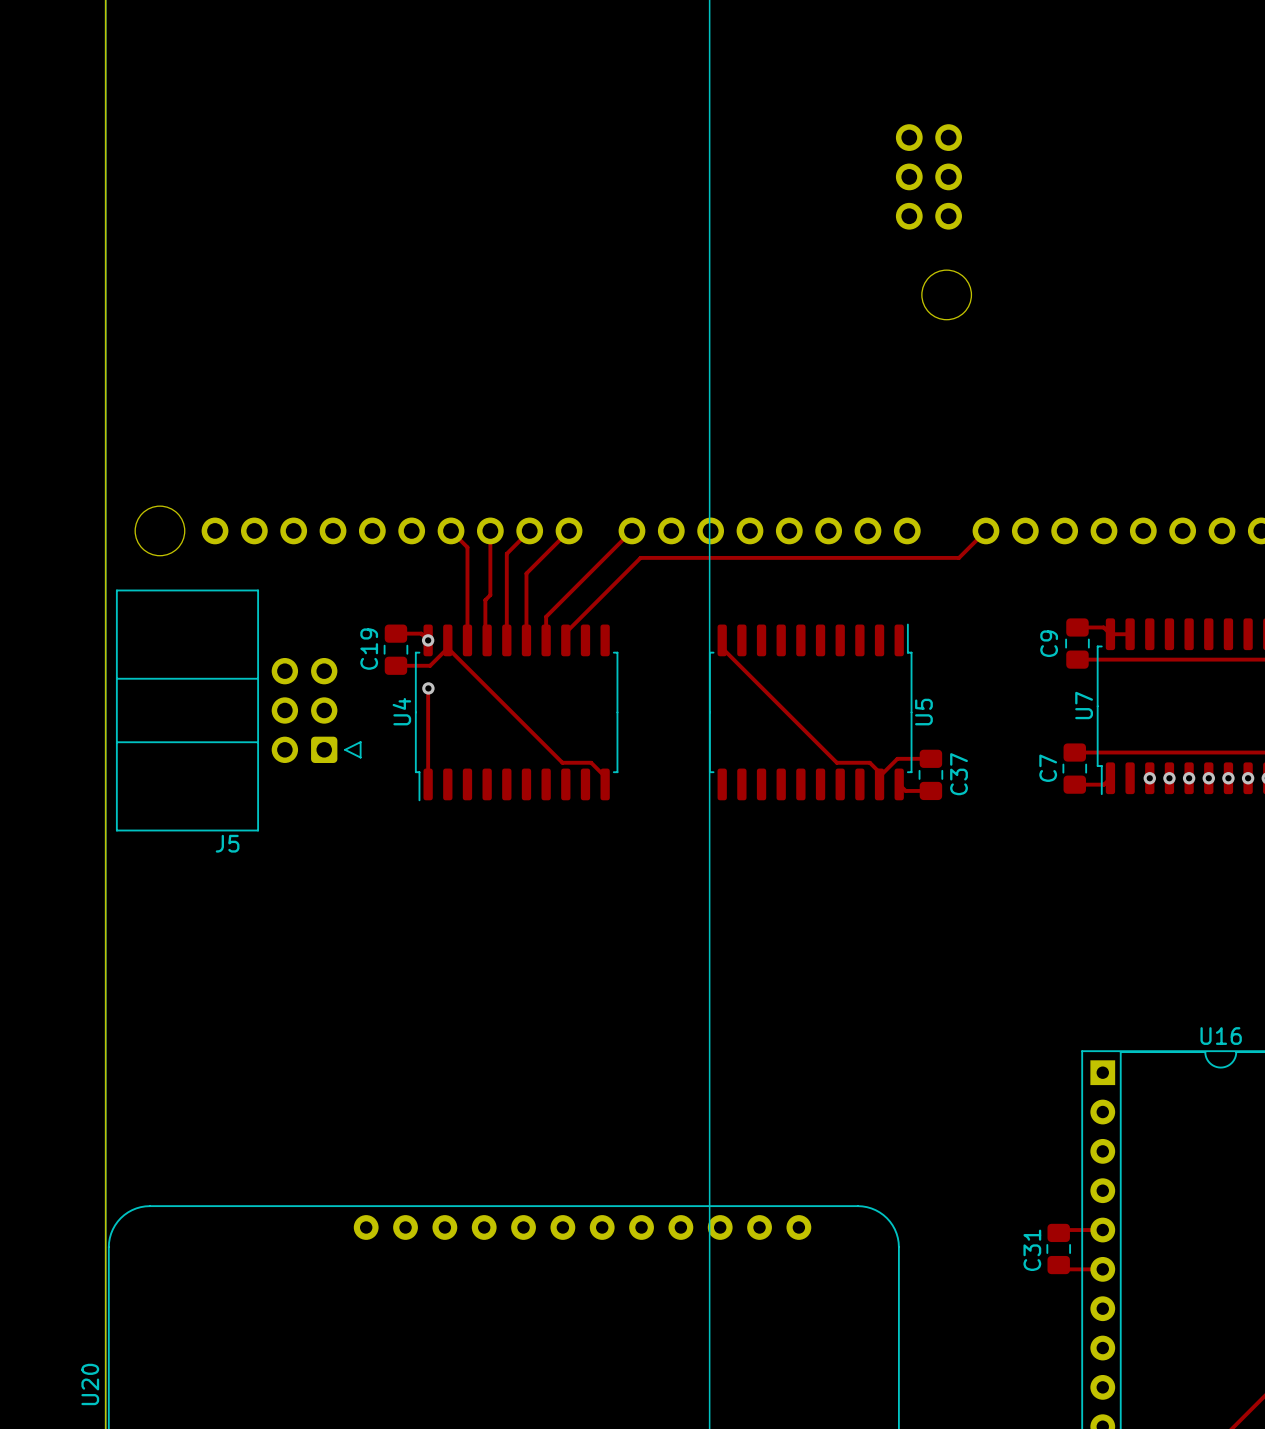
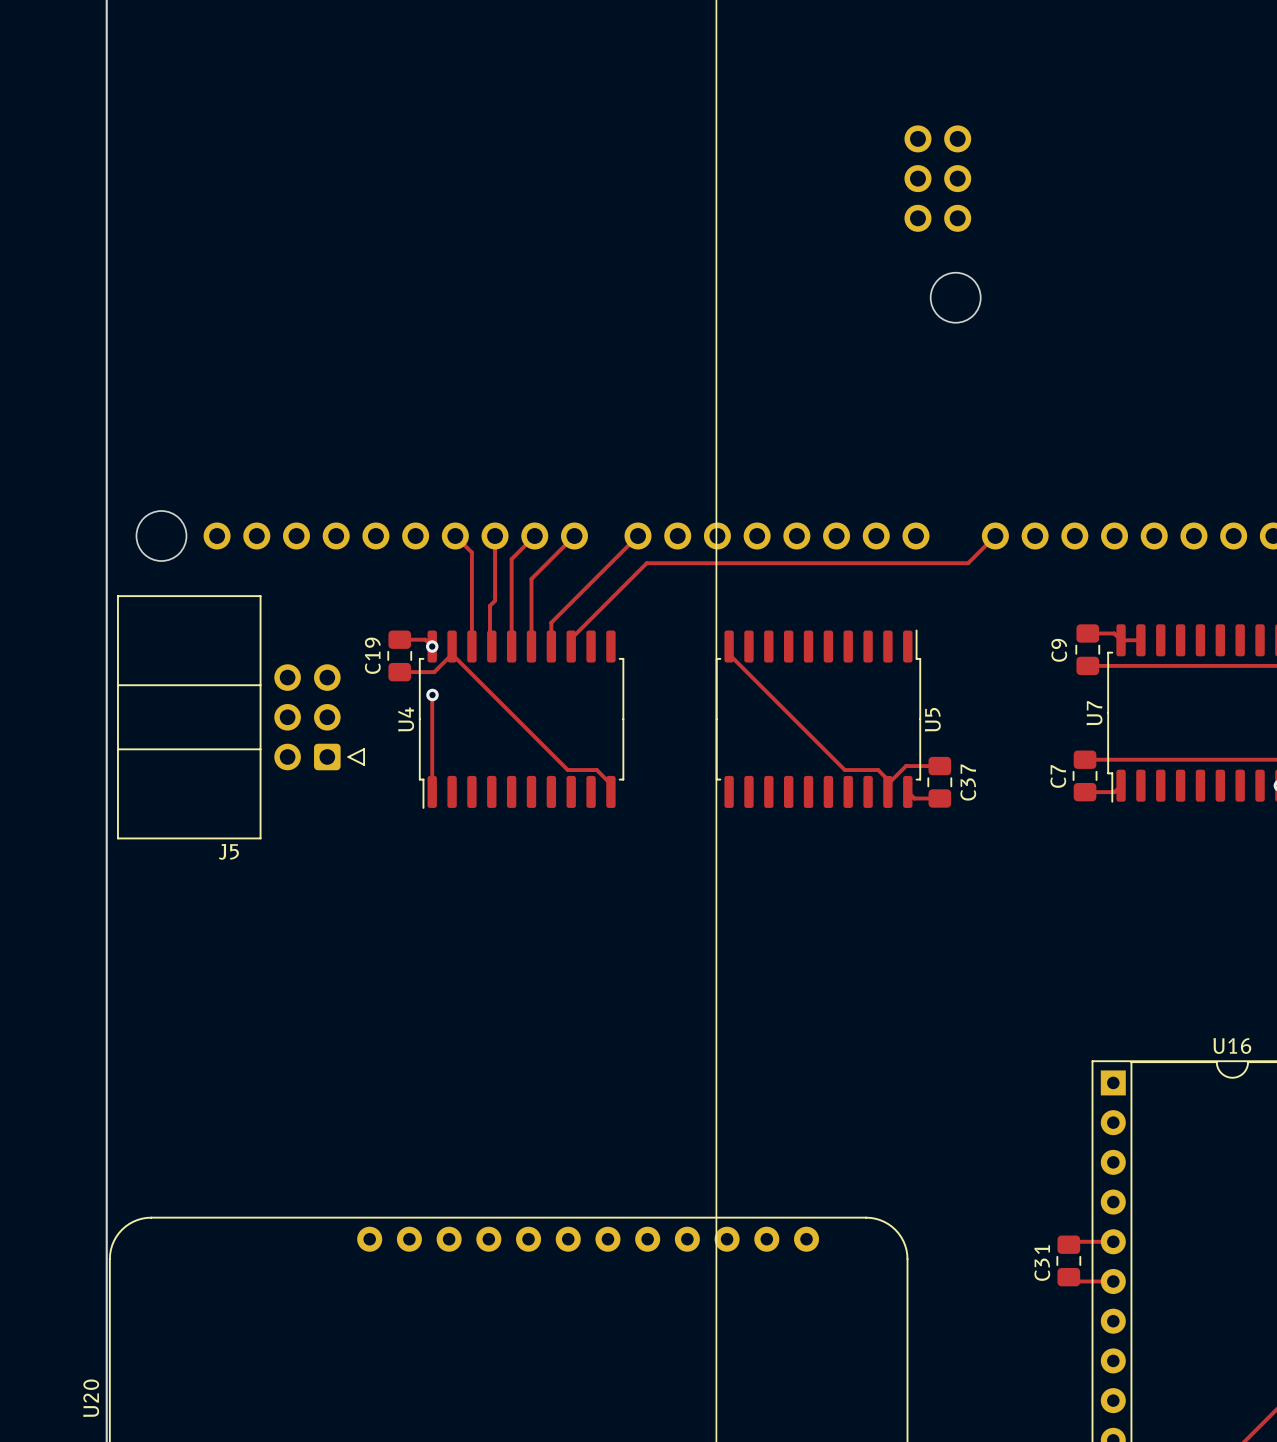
via: (1149, 778) -> none
via: (1169, 778) -> none
via: (1189, 778) -> none
via: (1208, 778) -> none
via: (1228, 778) -> none
via: (1248, 778) -> none

